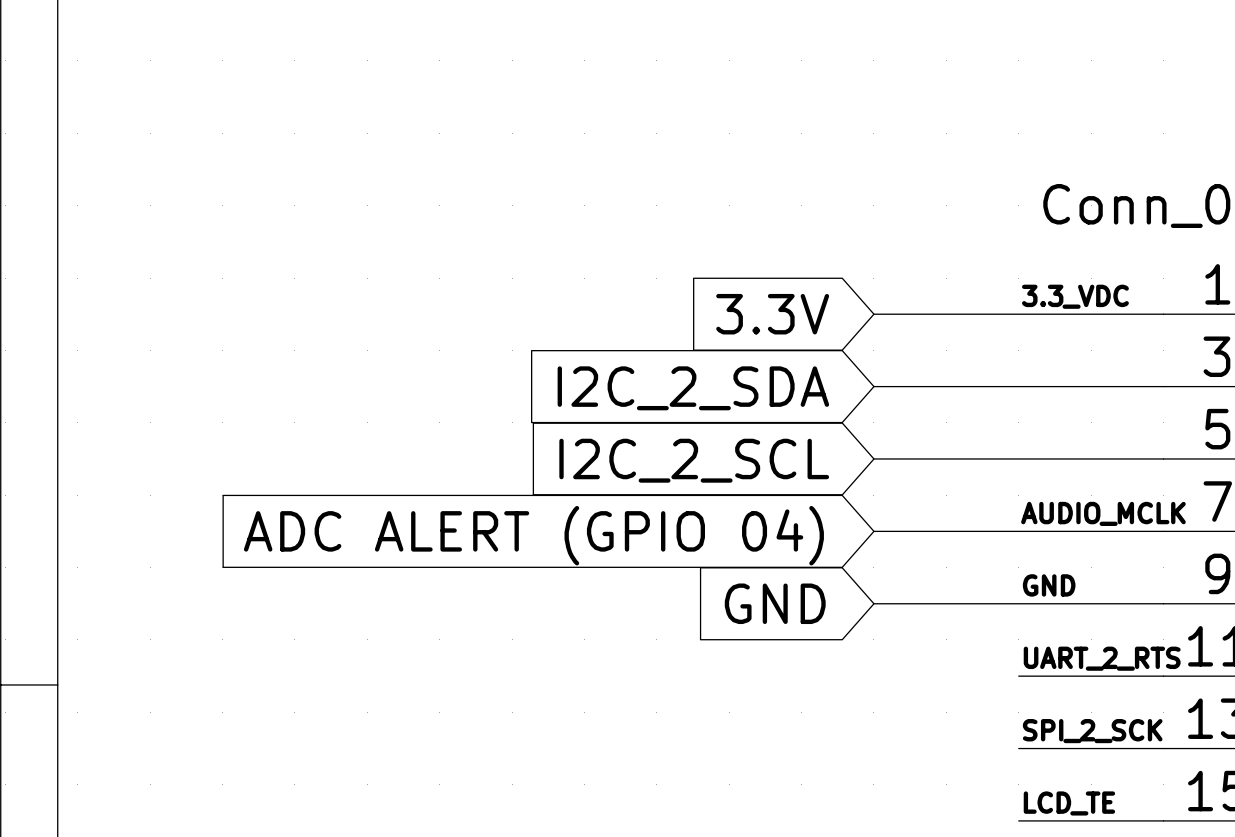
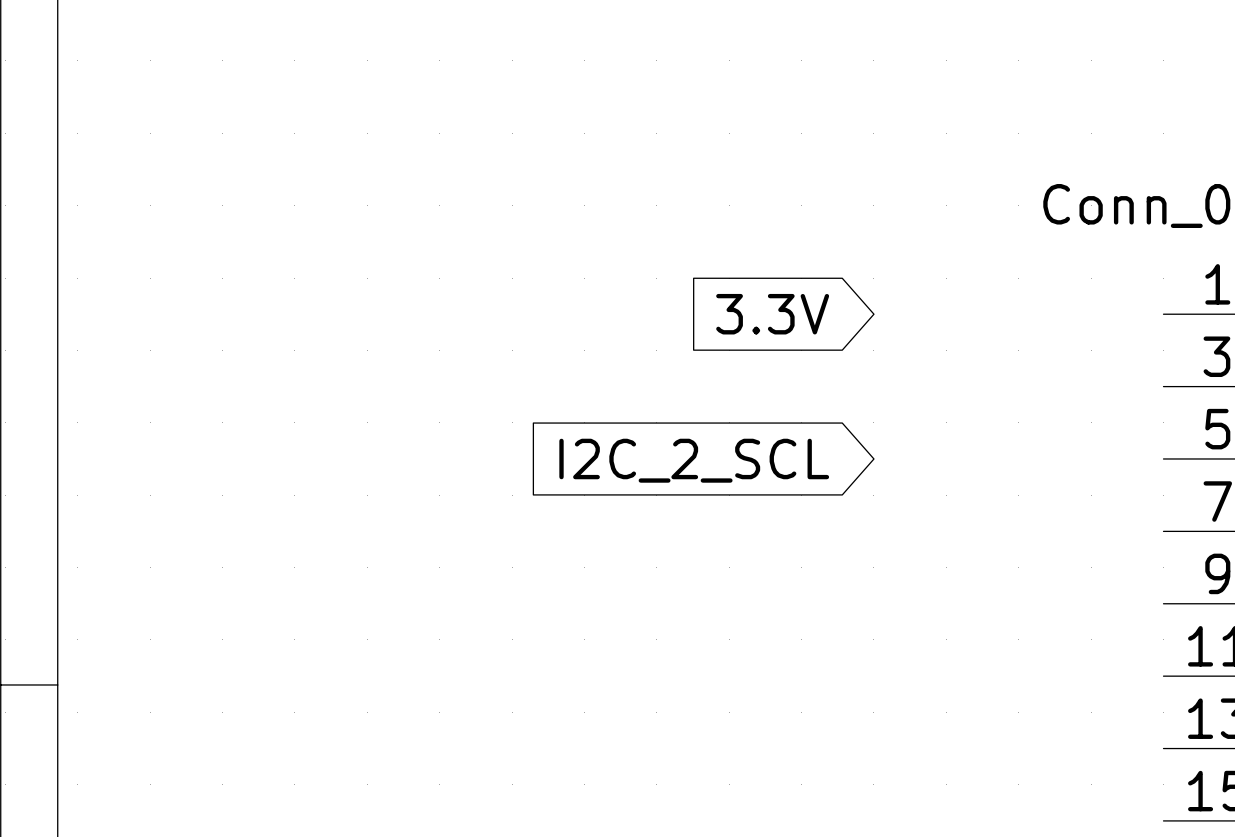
label: 3.3_VDC (1075, 296) -> none
wire: (873, 314) (1163, 314) -> none
wire: (873, 386) (1163, 386) -> none
global label: I2C_2_SDA (693, 388) -> none
wire: (873, 458) (1163, 458) -> none
label: AUDIO_MCLK (1103, 513) -> none
wire: (873, 531) (1163, 531) -> none
global label: ADC ALERT (GPIO 04) (533, 535) -> none
label: GND (1049, 585) -> none
global label: GND (775, 603) -> none
wire: (873, 603) (1163, 603) -> none
label: UART_2_RTS (1102, 658) -> none
wire: (1018, 676) (1163, 676) -> none
label: SPI_2_SCK (1092, 731) -> none
wire: (1018, 748) (1163, 748) -> none
label: LCD_TE (1069, 803) -> none
wire: (1018, 820) (1163, 820) -> none

